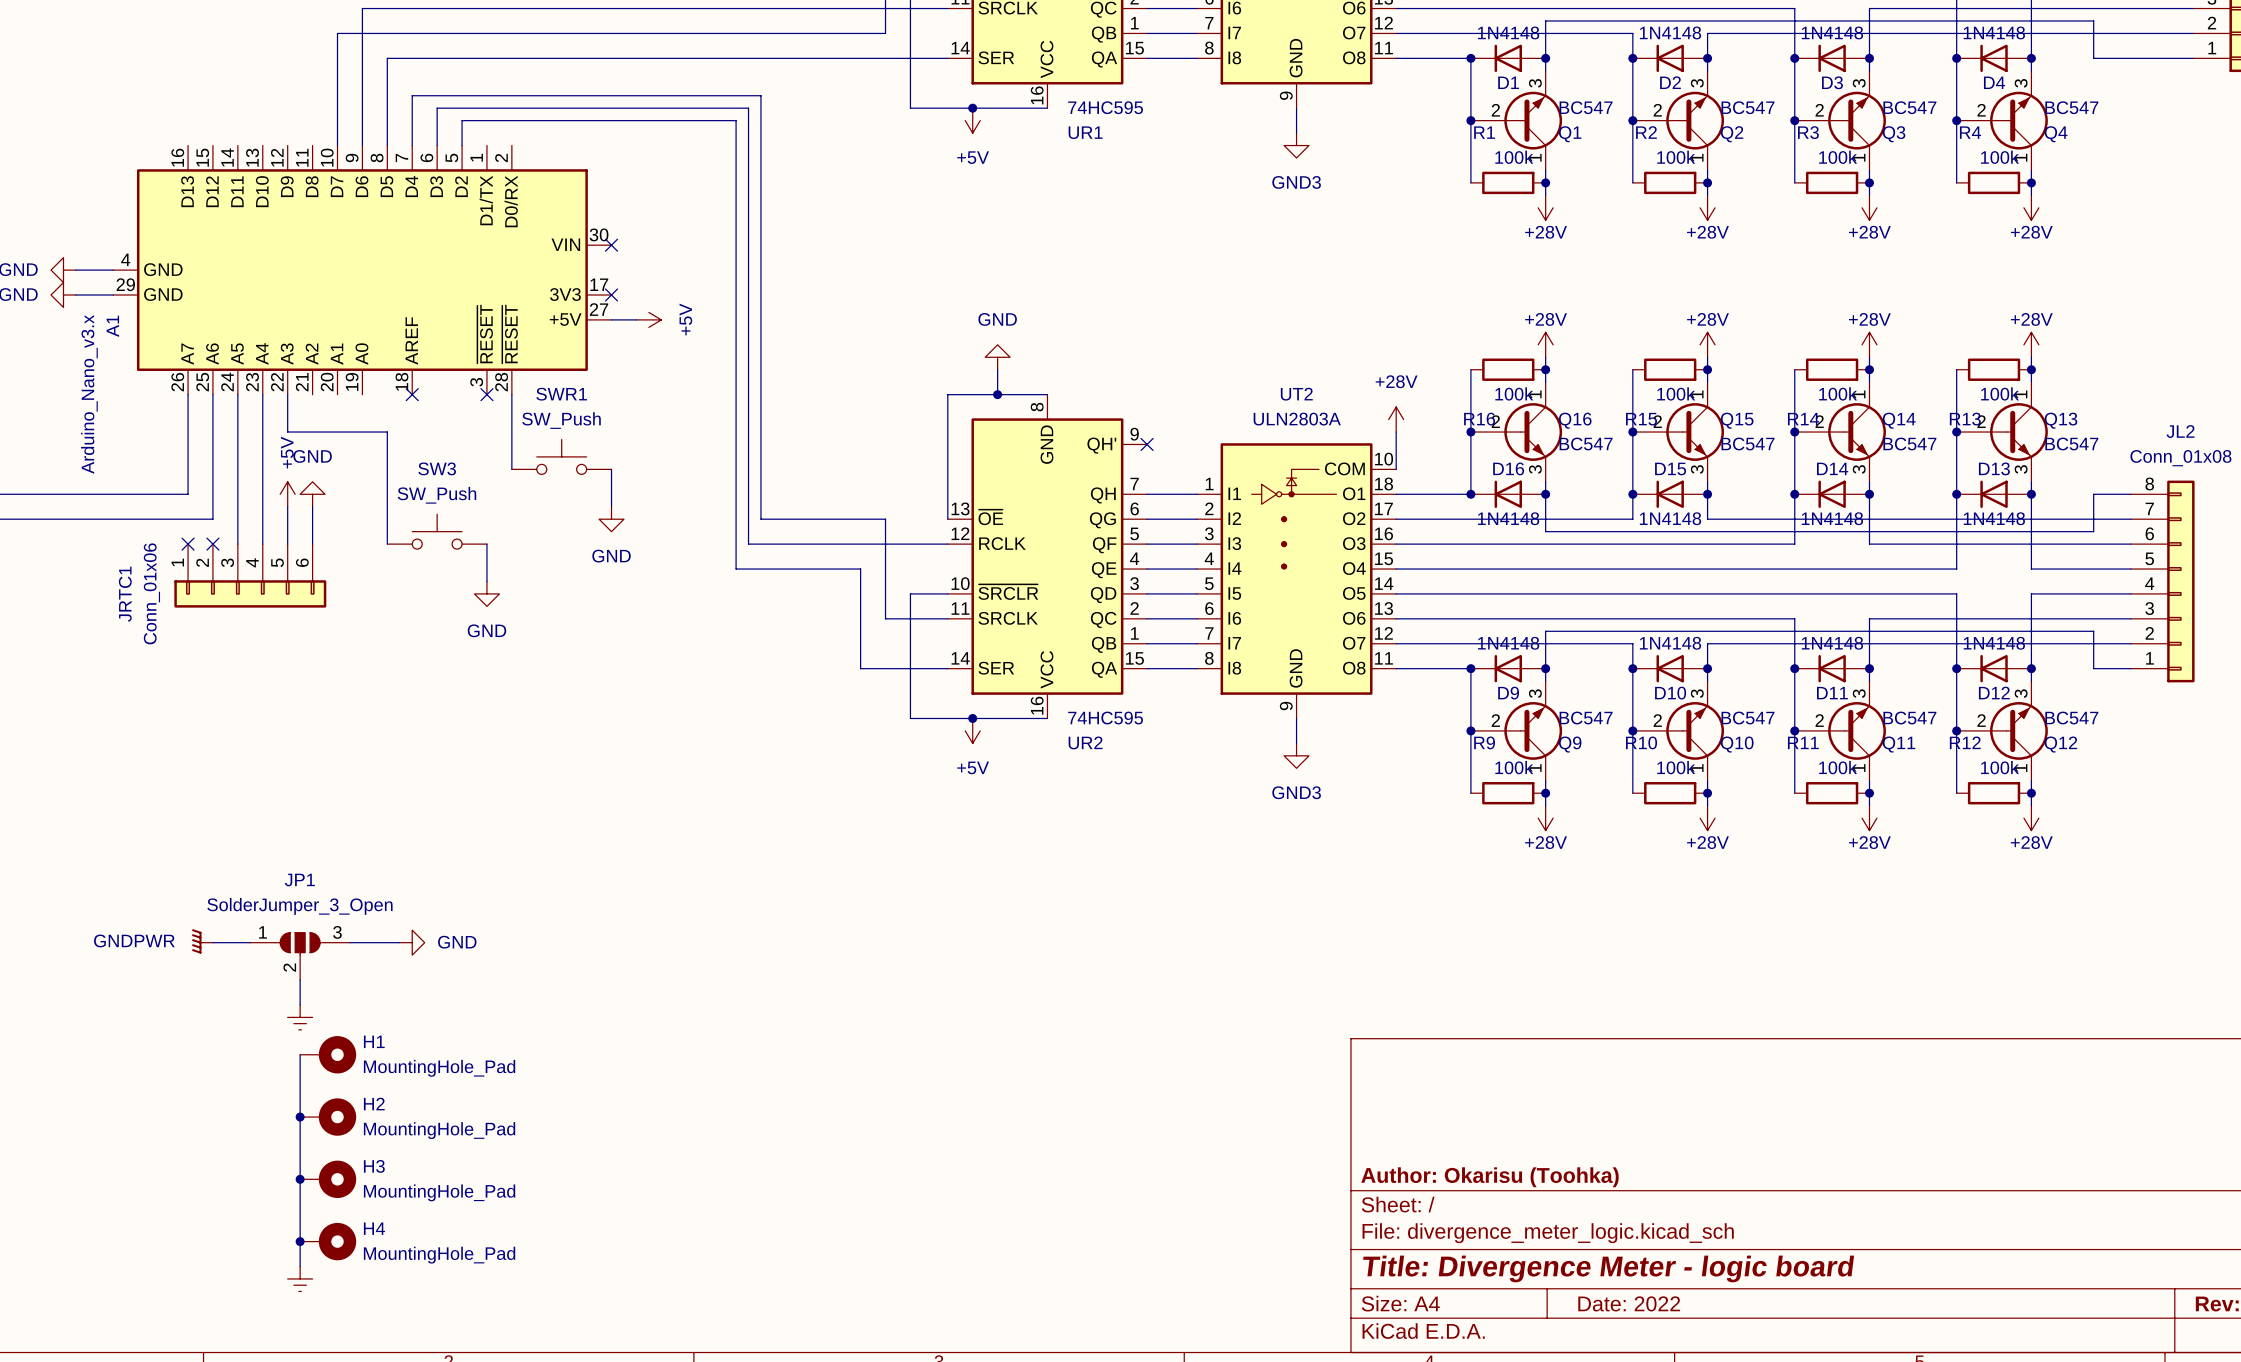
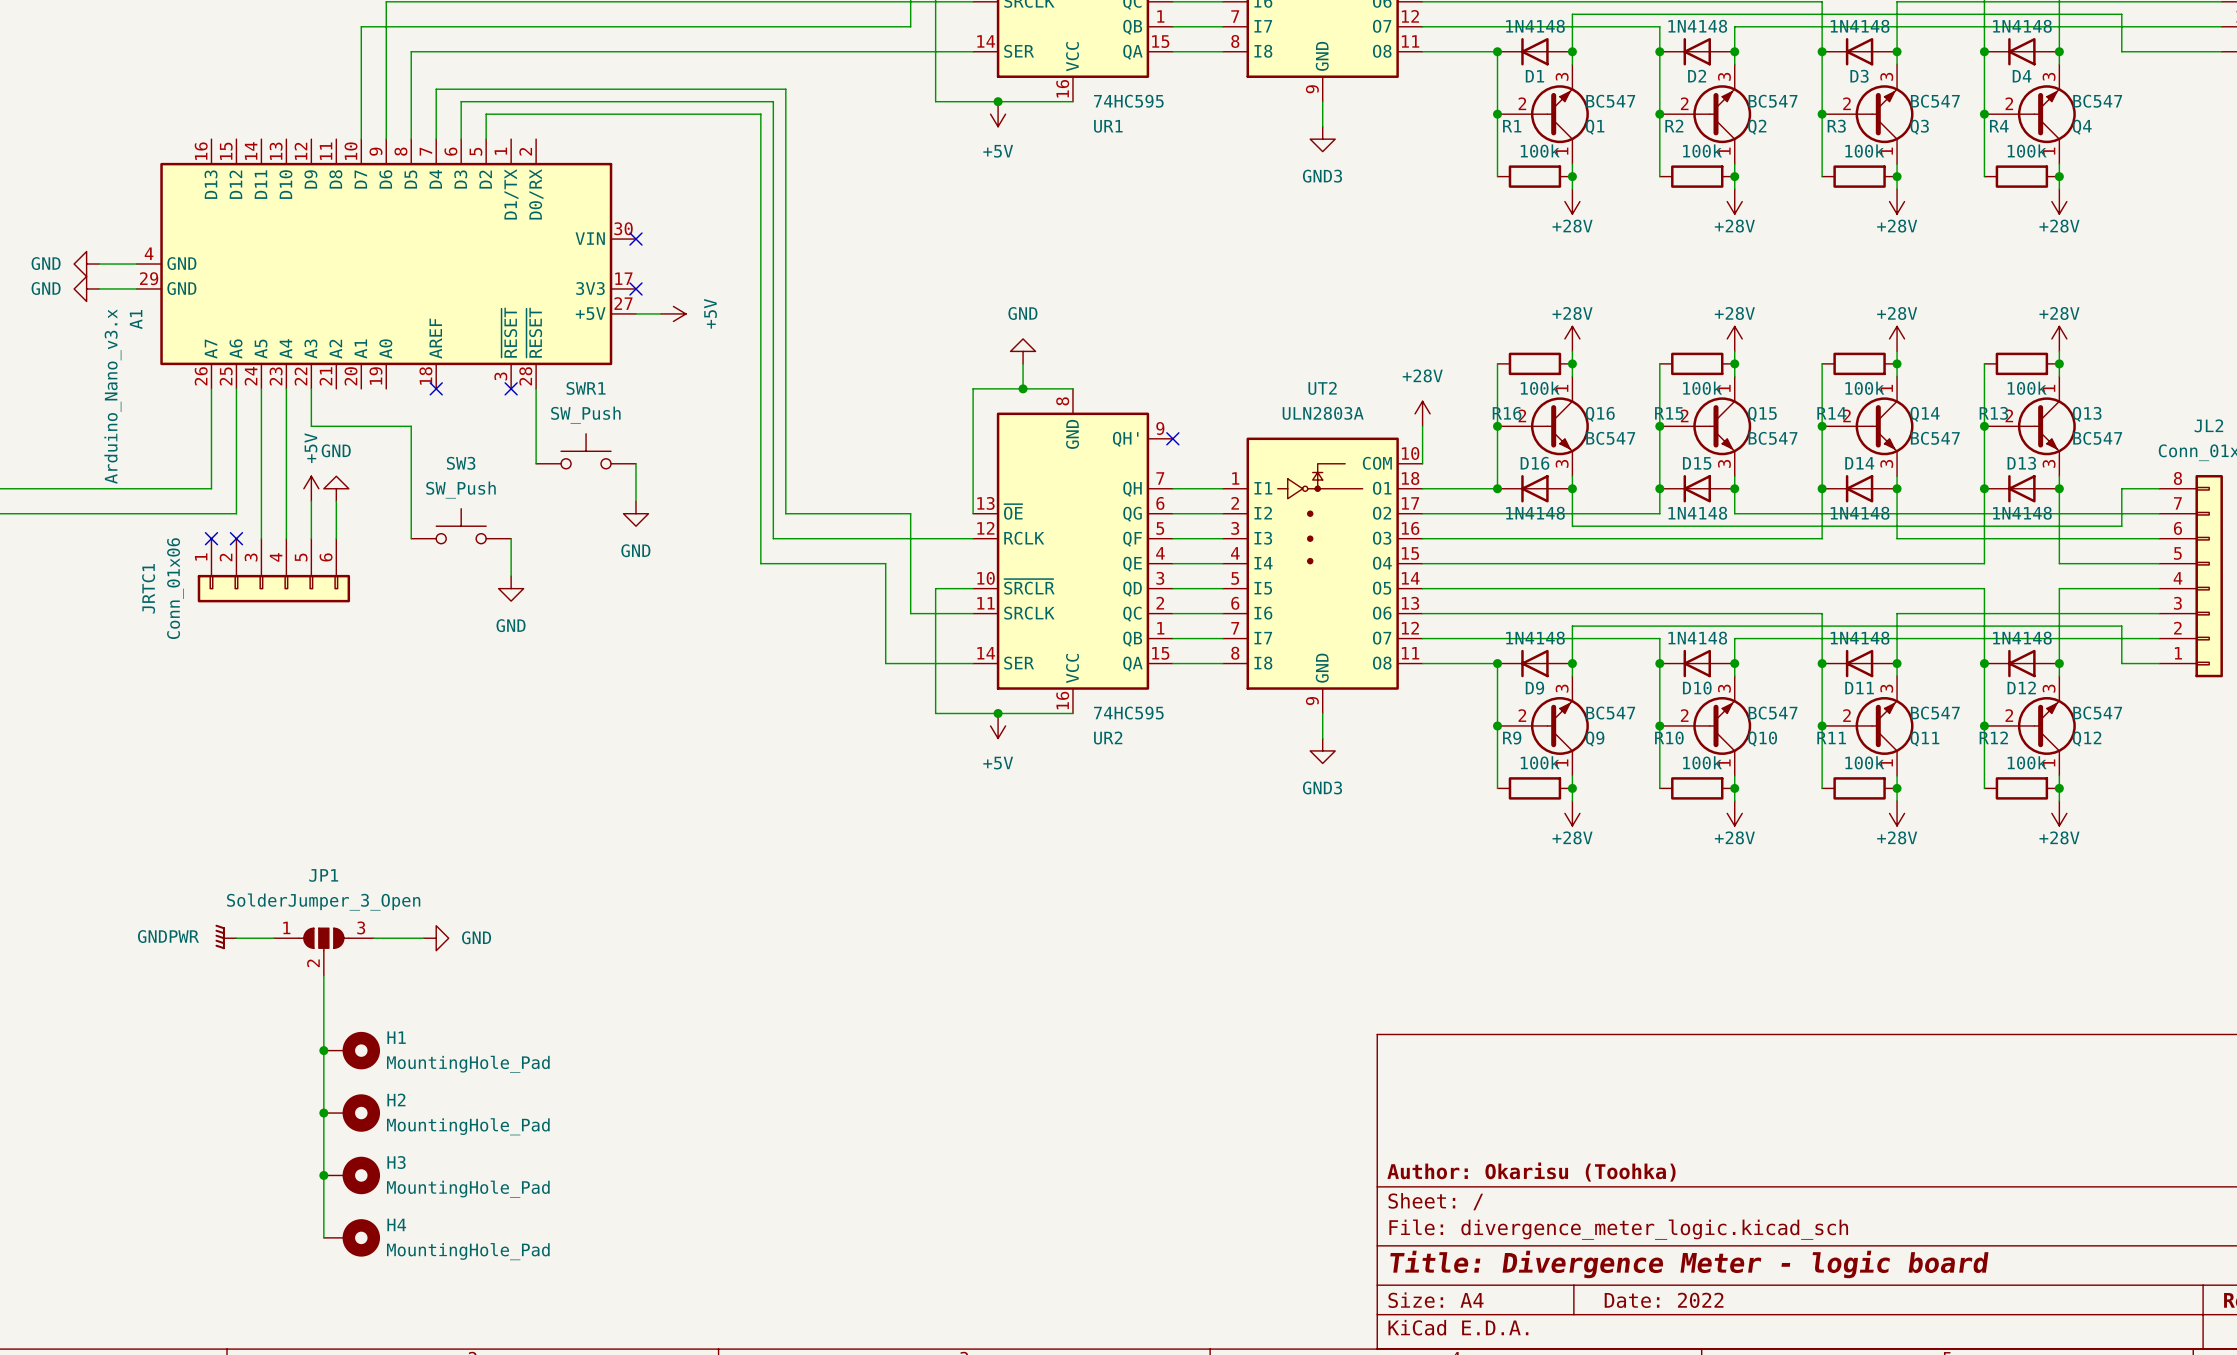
wire: none -> (323, 1000) (323, 1050)
power symbol: (300, 1017) -> none
junction: none -> (323, 1050)
wire: (300, 1241) (300, 1266) -> none
junction: (300, 1241) -> none
power symbol: (300, 1278) -> none

